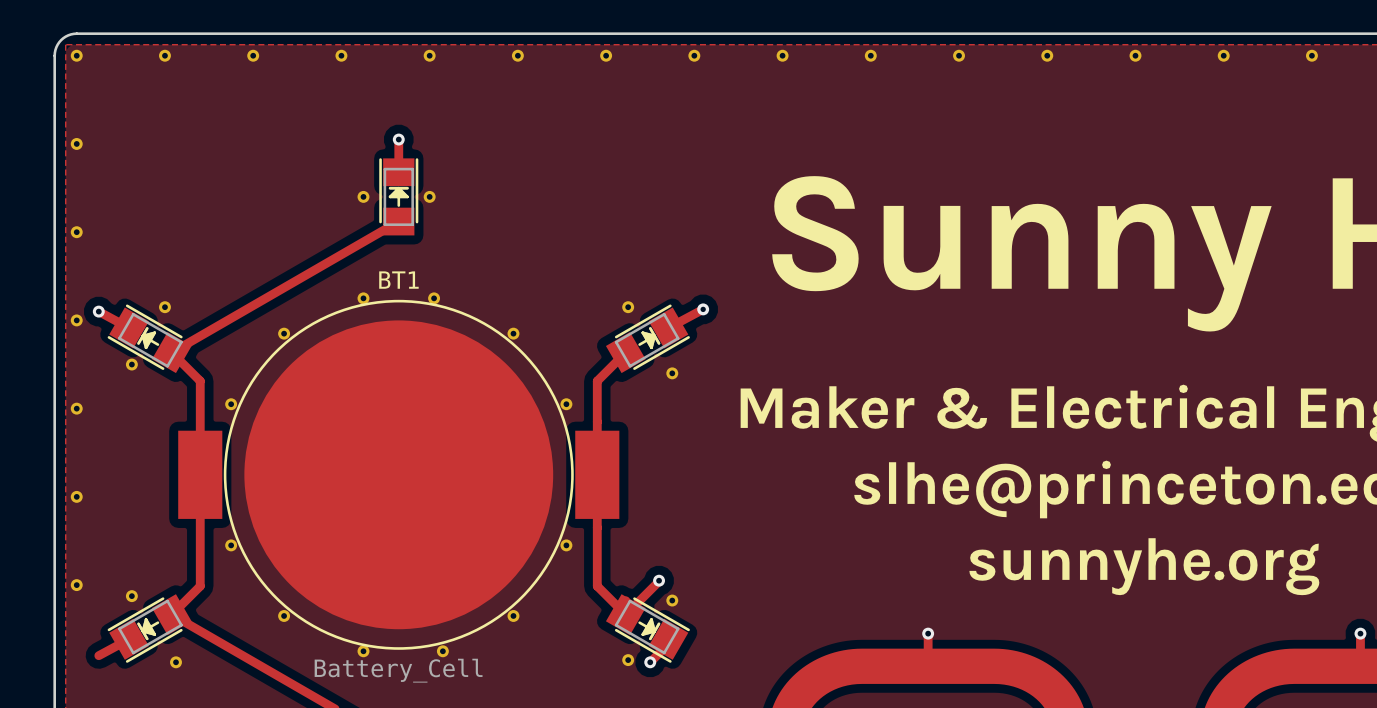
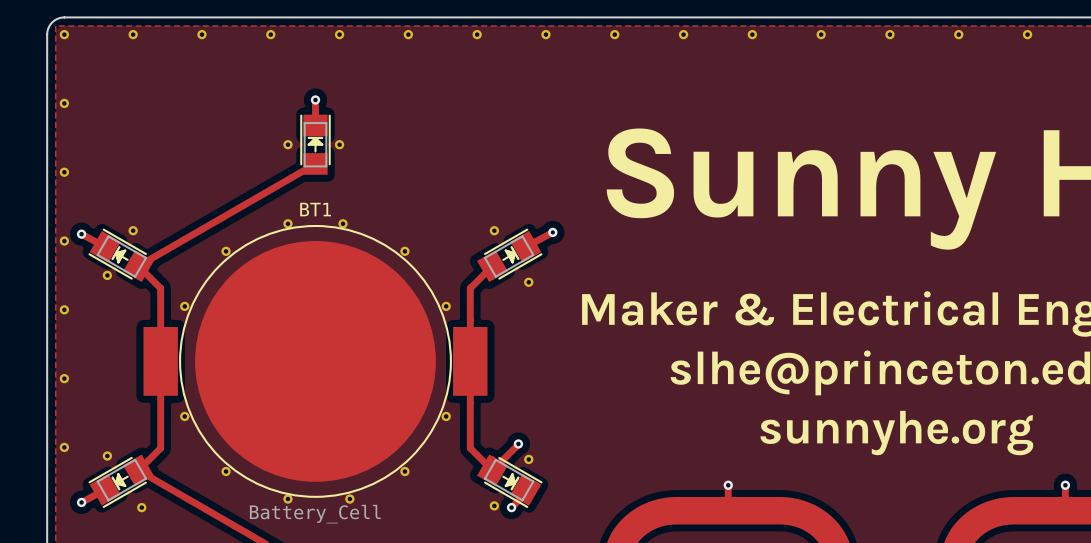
via: none -> (81, 502)

